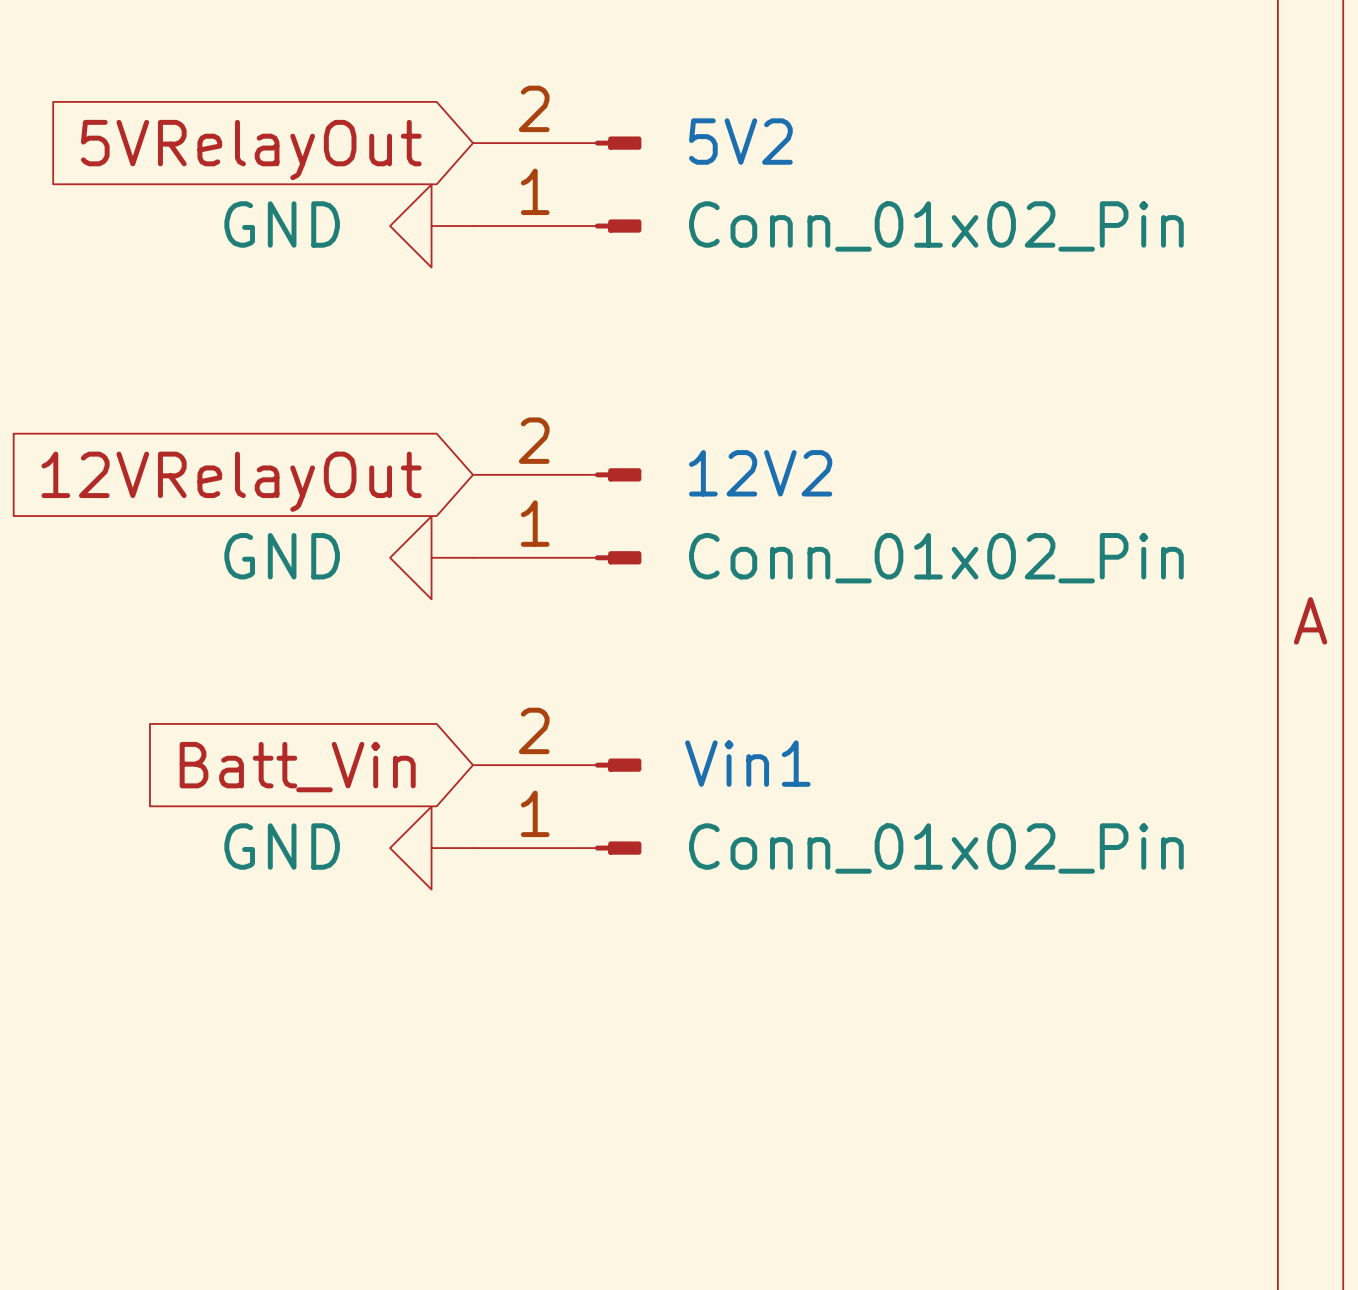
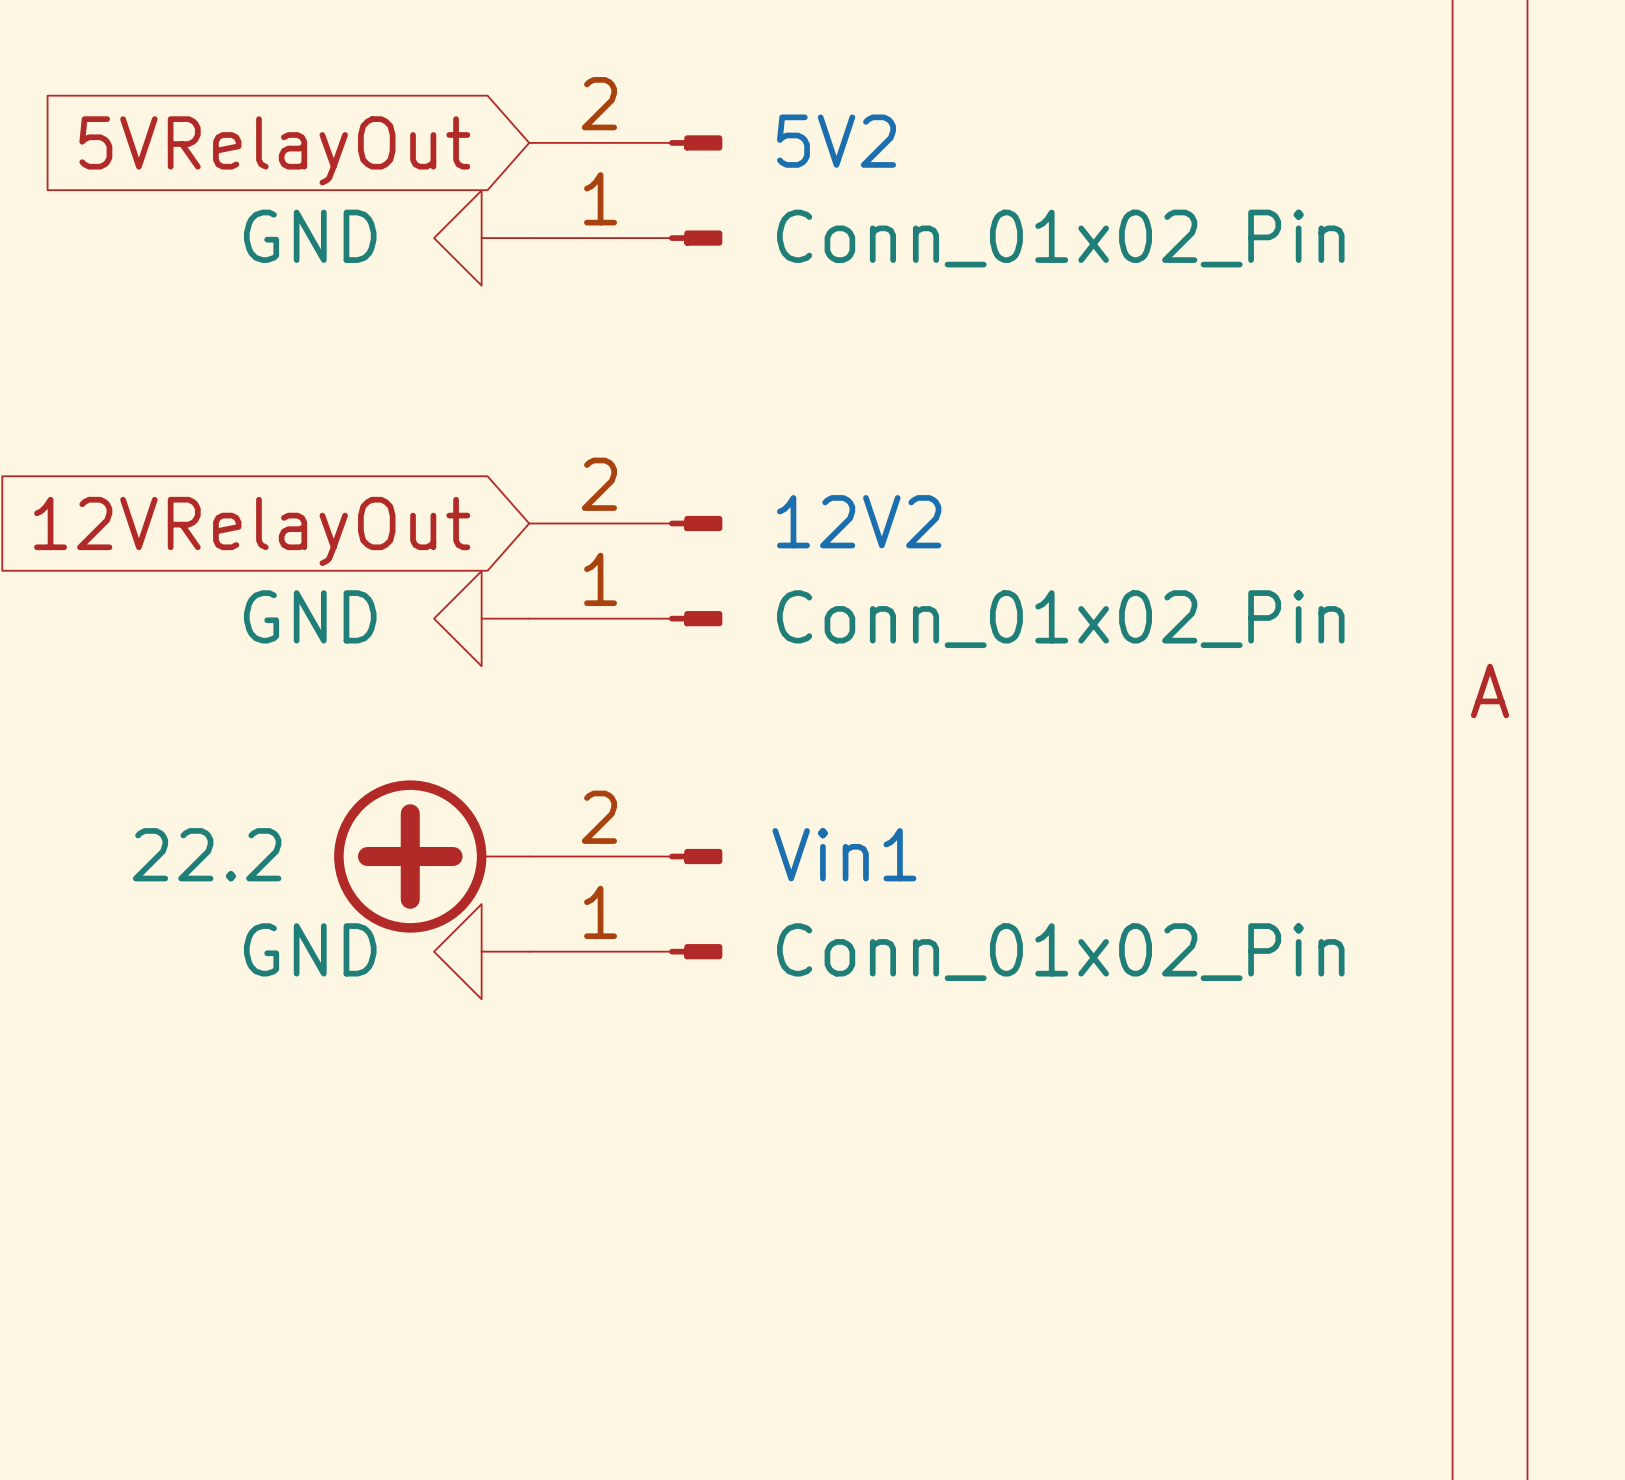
power symbol: none -> 22.2 (431, 856)
global label: Batt_Vin (297, 767) -> none

